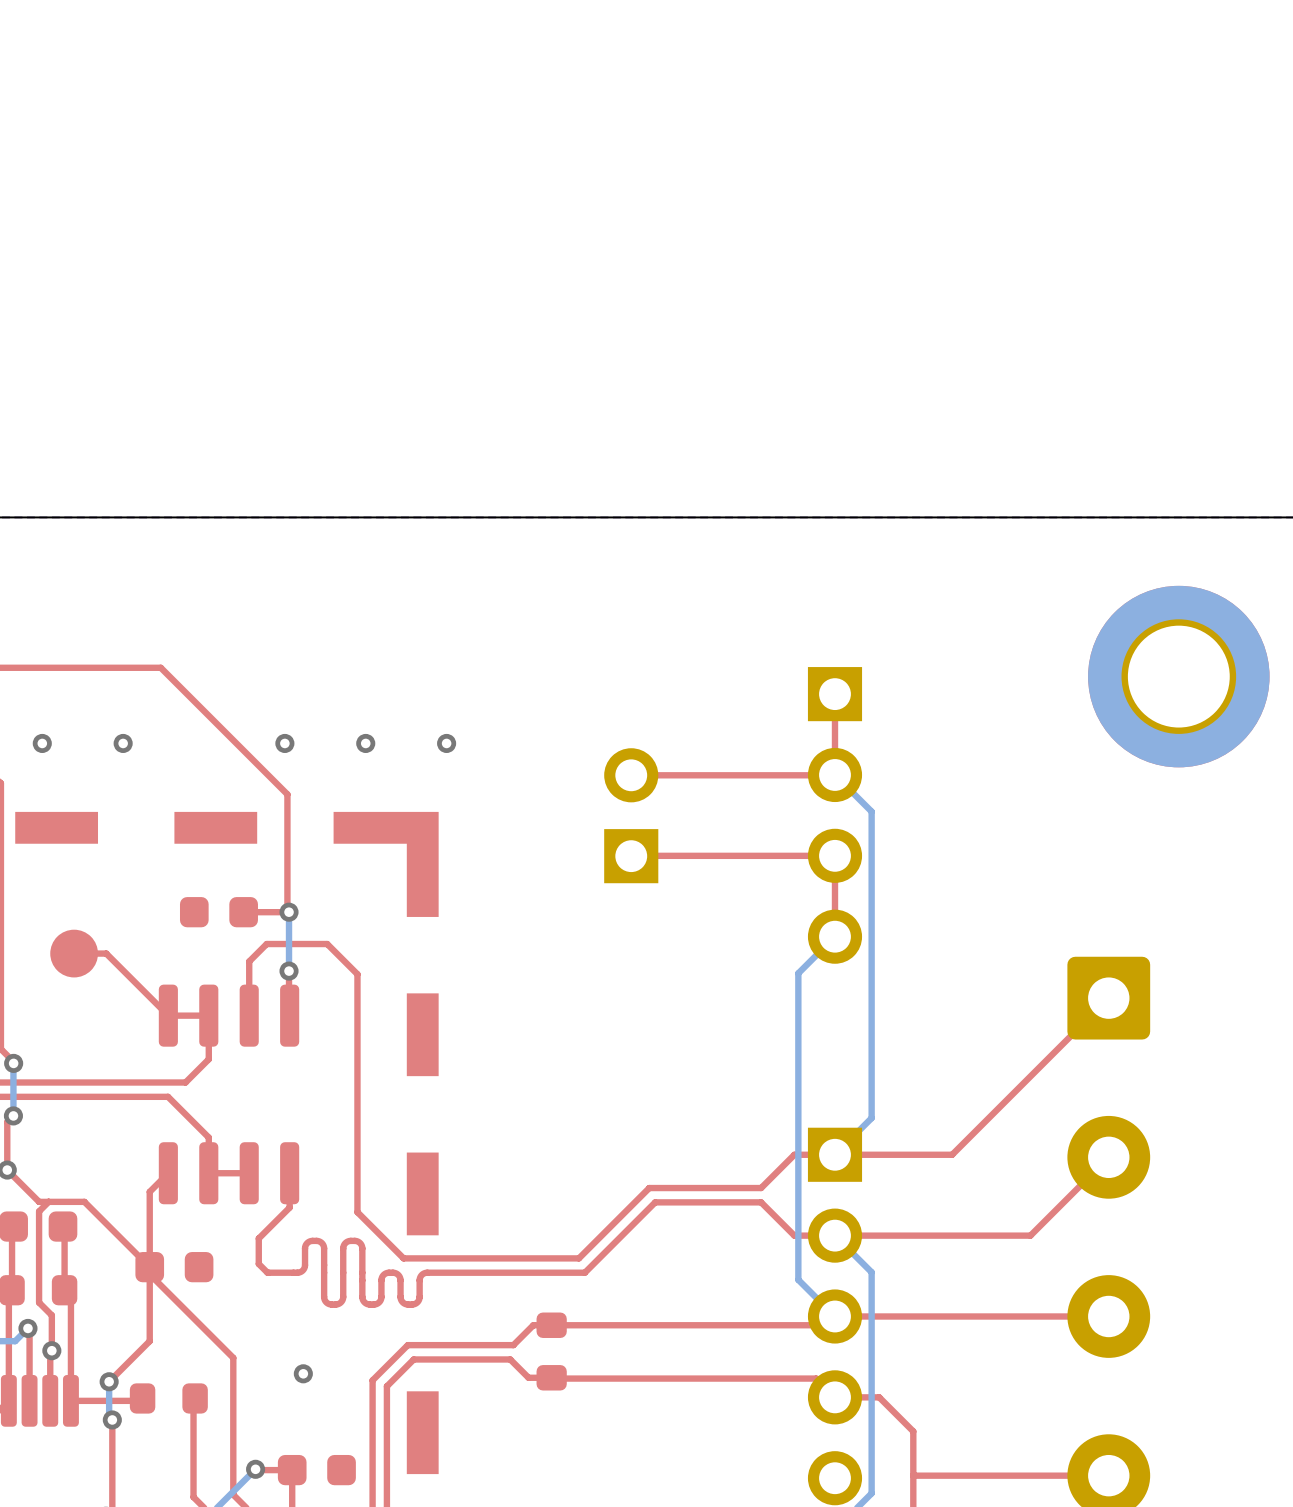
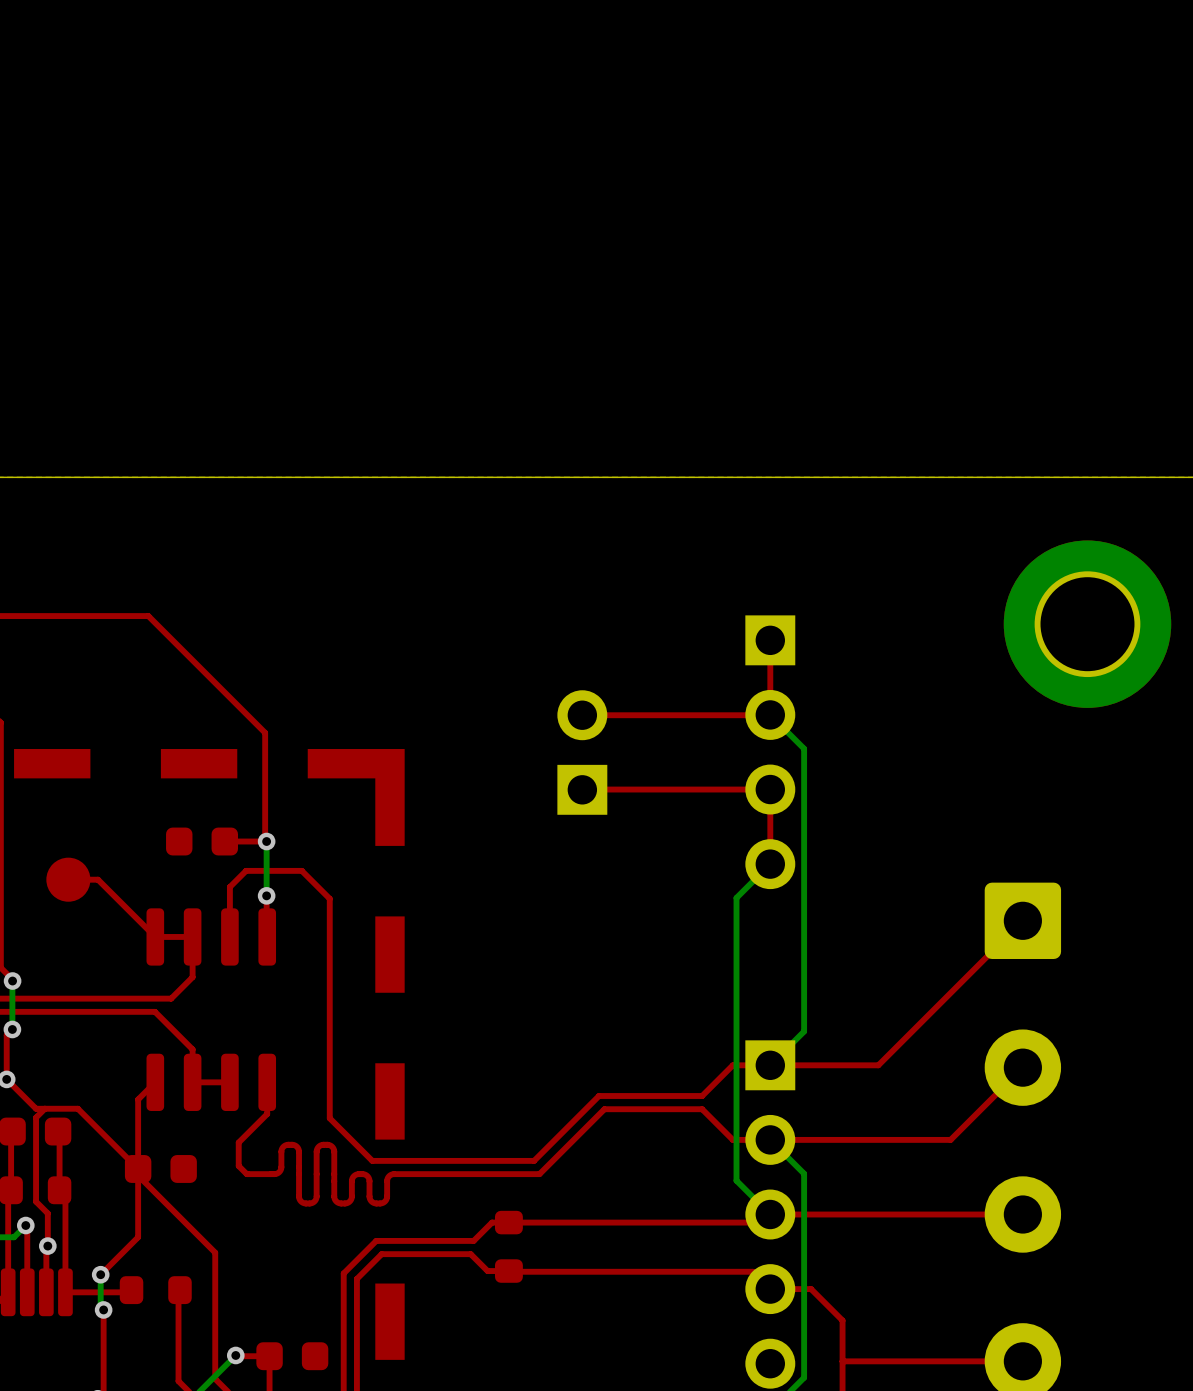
via: (42, 743) -> none
via: (123, 743) -> none
via: (284, 743) -> none
via: (365, 743) -> none
via: (446, 743) -> none
via: (303, 1373) -> none

